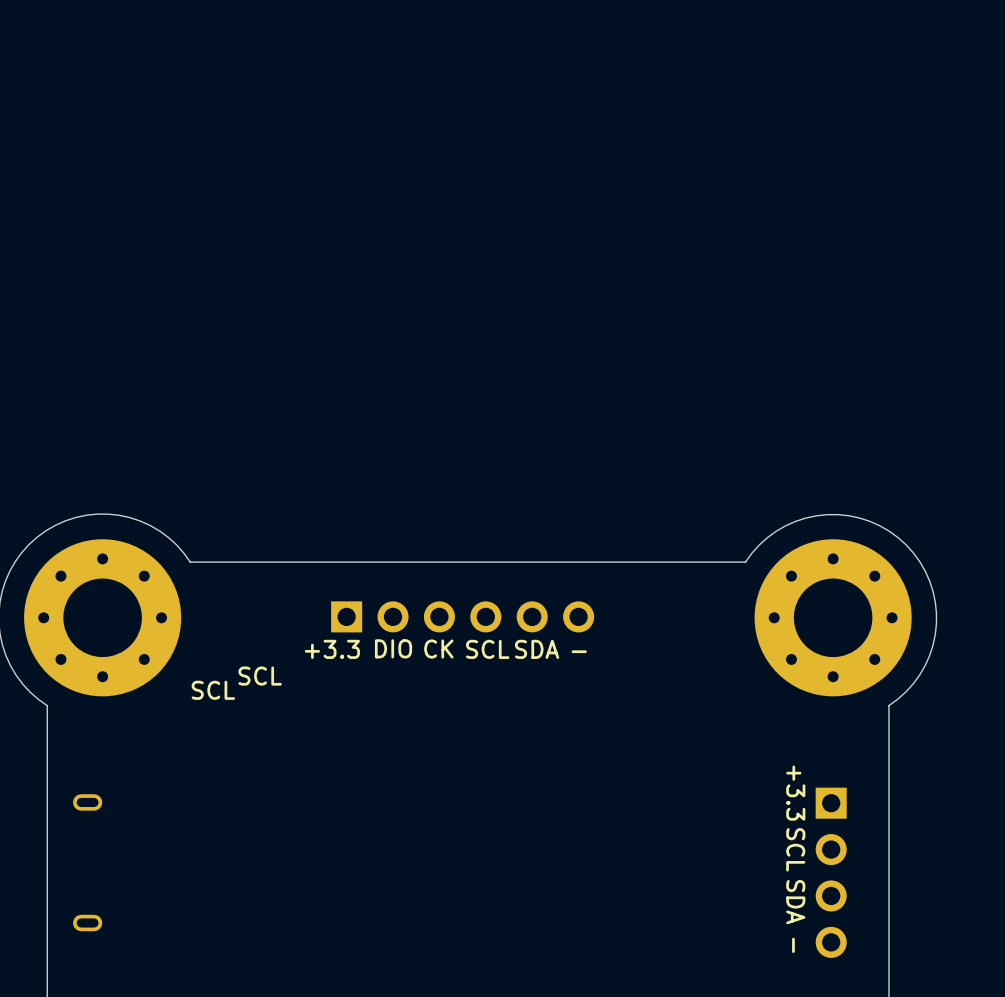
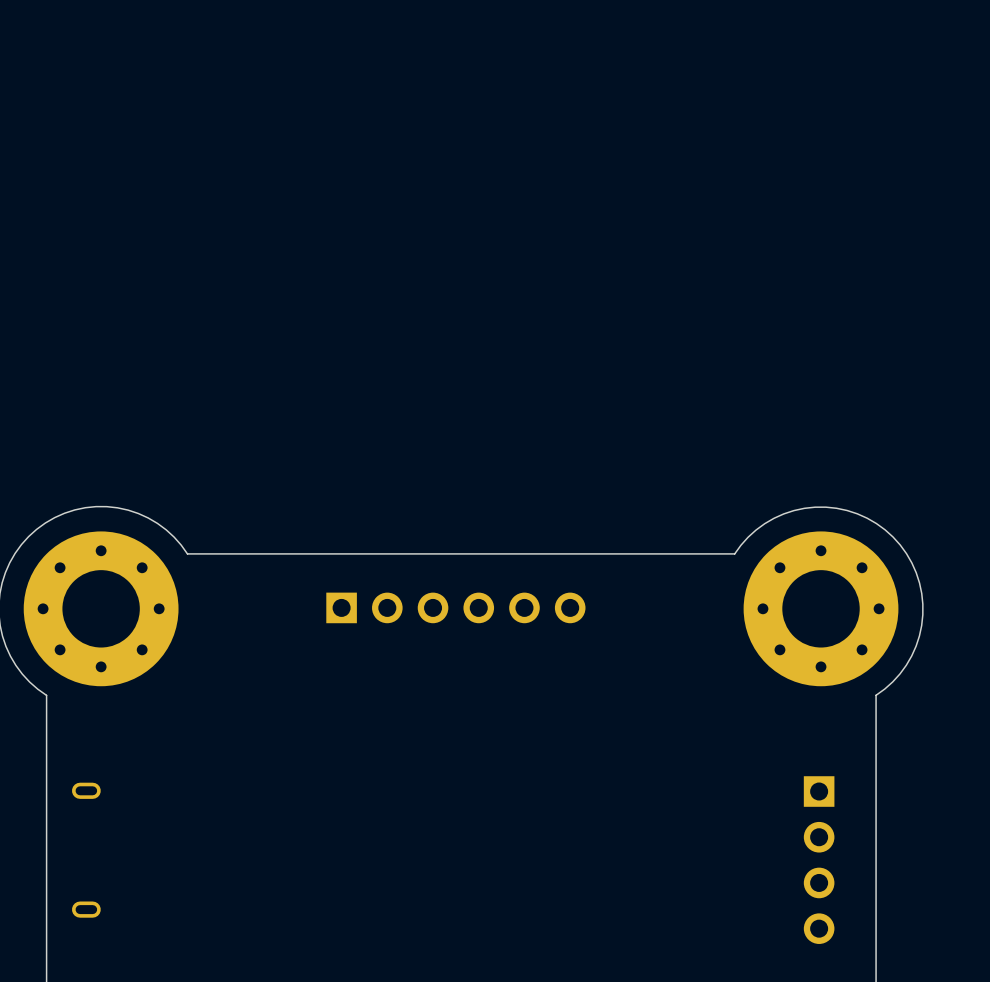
text: DIO (393, 648) -> none
text: +3.3 (332, 649) -> none
text: CK (438, 649) -> none
text: SCL (487, 649) -> none
text: SDA (537, 649) -> none
text: - (579, 651) -> none
text: SCL (260, 676) -> none
text: SCL (213, 690) -> none
text: +3.3 (795, 793) -> none
text: SCL (795, 849) -> none
text: SDA (795, 902) -> none
text: - (793, 945) -> none

